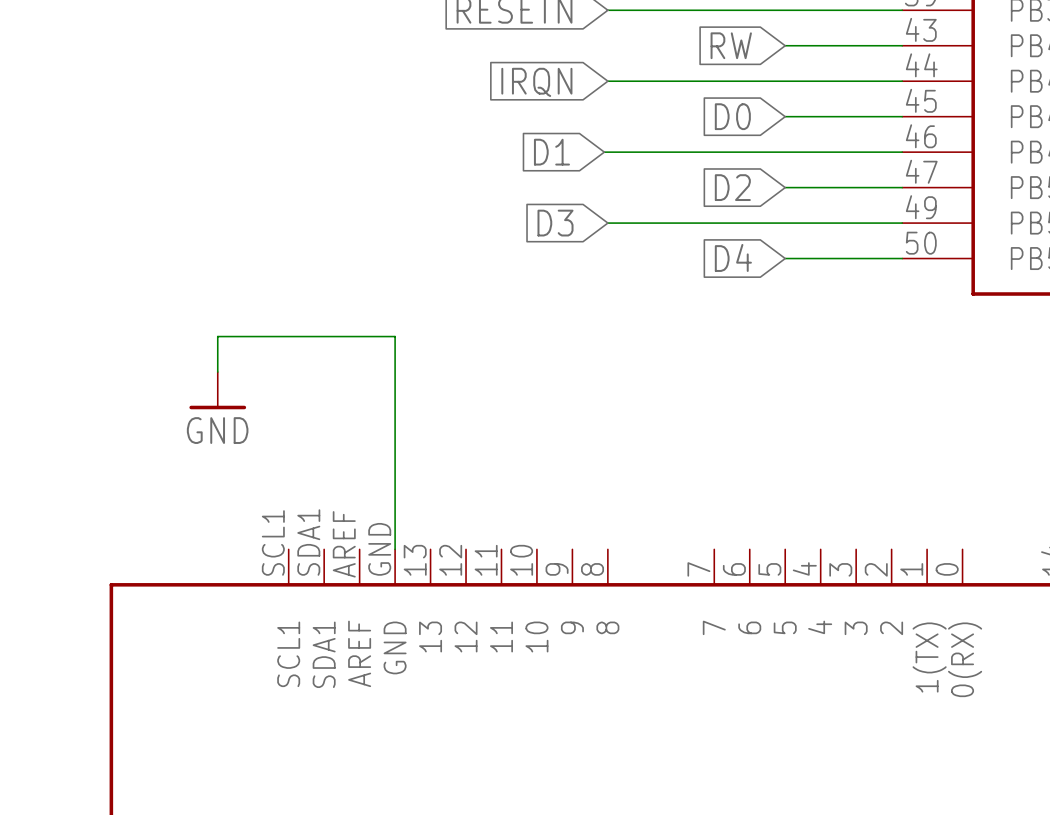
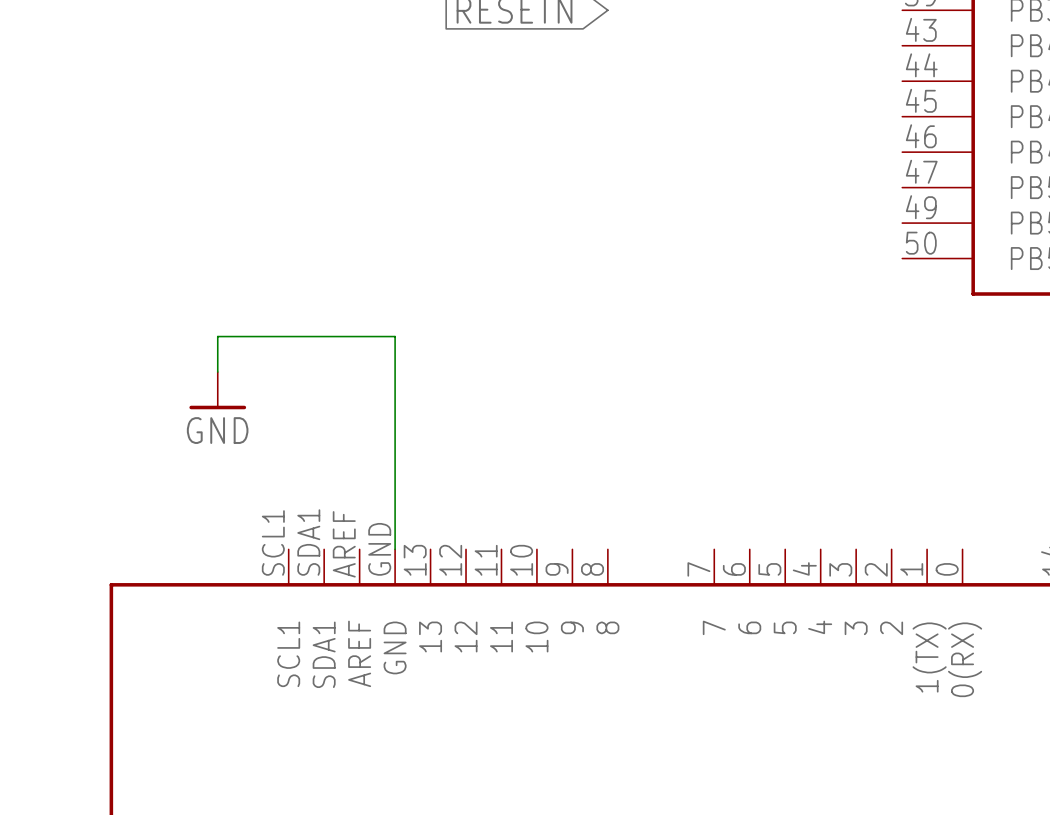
wire: (607, 10) (902, 10) -> none
global label: RW (731, 45) -> none
wire: (785, 45) (902, 45) -> none
wire: (607, 81) (902, 81) -> none
global label: IRQN (536, 82) -> none
global label: D0 (732, 116) -> none
wire: (785, 116) (902, 116) -> none
global label: D1 (551, 152) -> none
wire: (604, 152) (902, 152) -> none
global label: D2 (732, 187) -> none
wire: (785, 187) (902, 187) -> none
global label: D3 (555, 223) -> none
wire: (607, 223) (902, 223) -> none
global label: D4 (733, 257) -> none
wire: (785, 258) (902, 258) -> none

